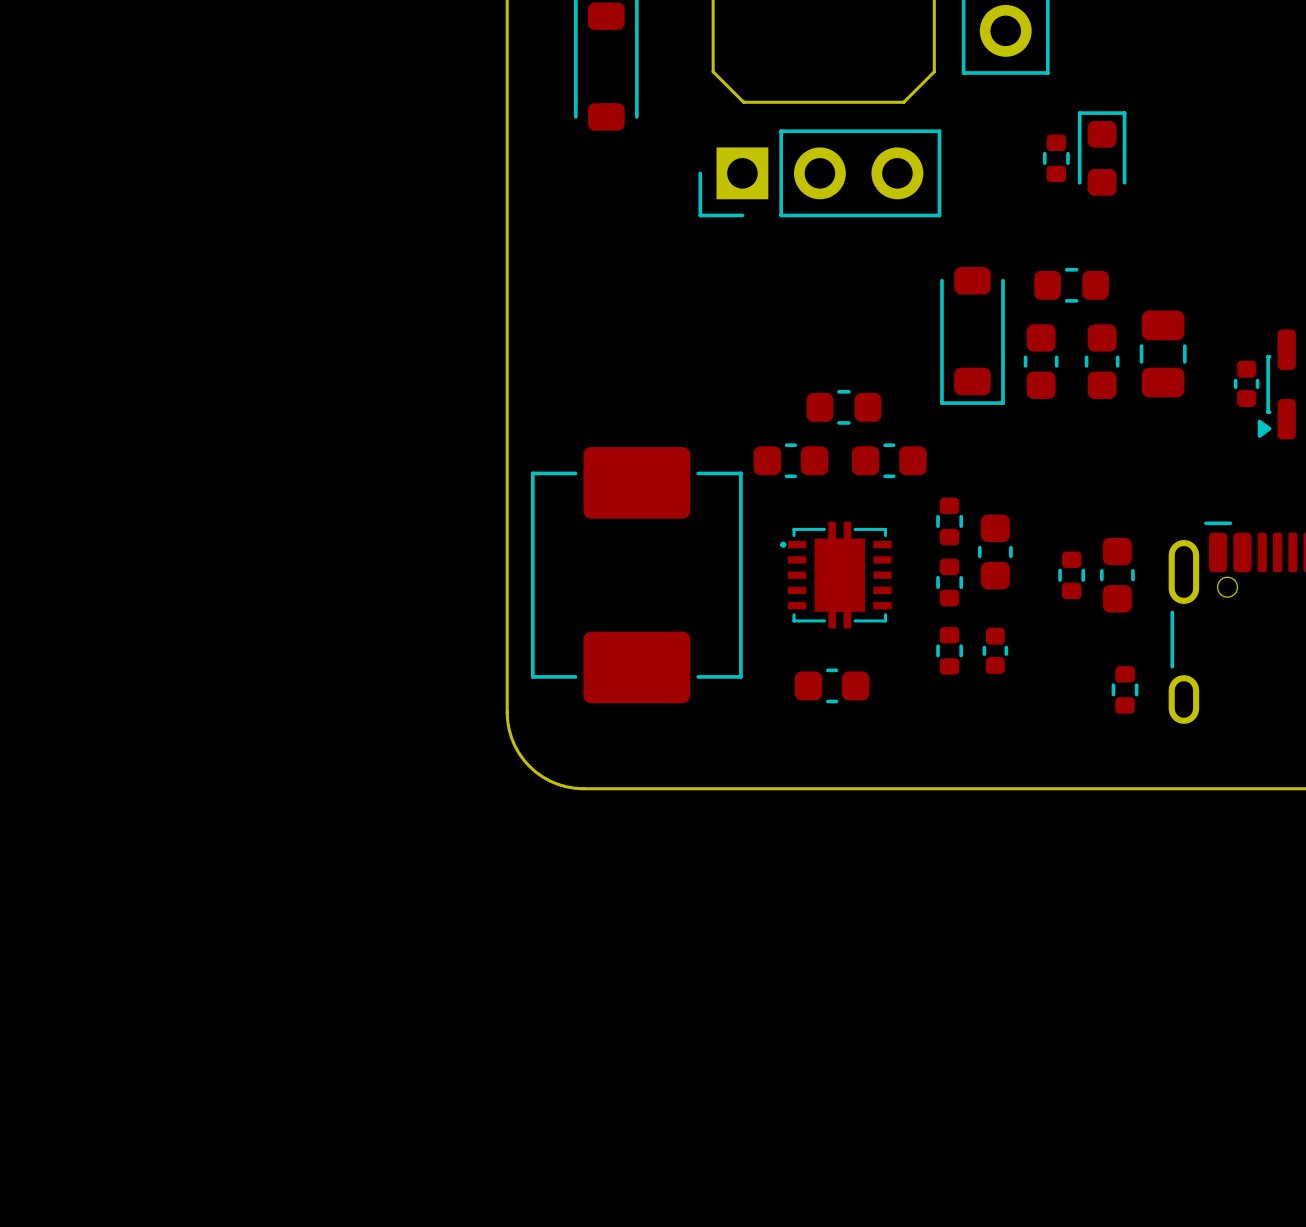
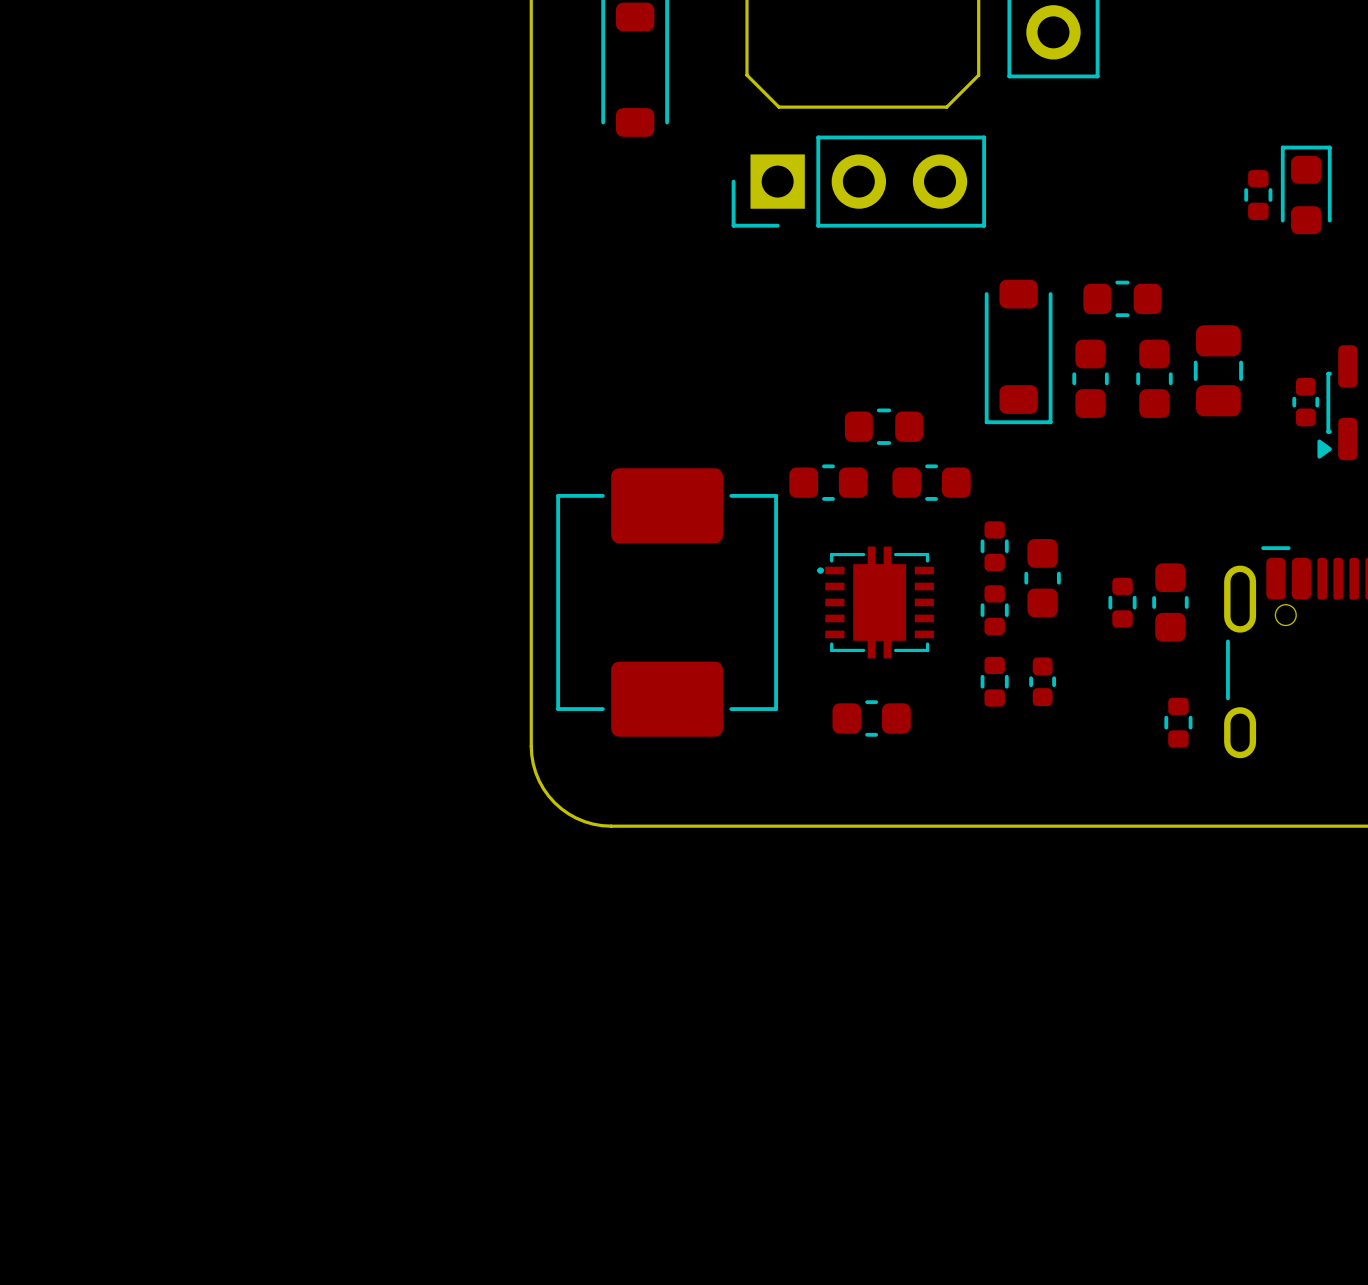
part position: (1102, 153) -> (1306, 189)
part position: (1056, 158) -> (1258, 195)

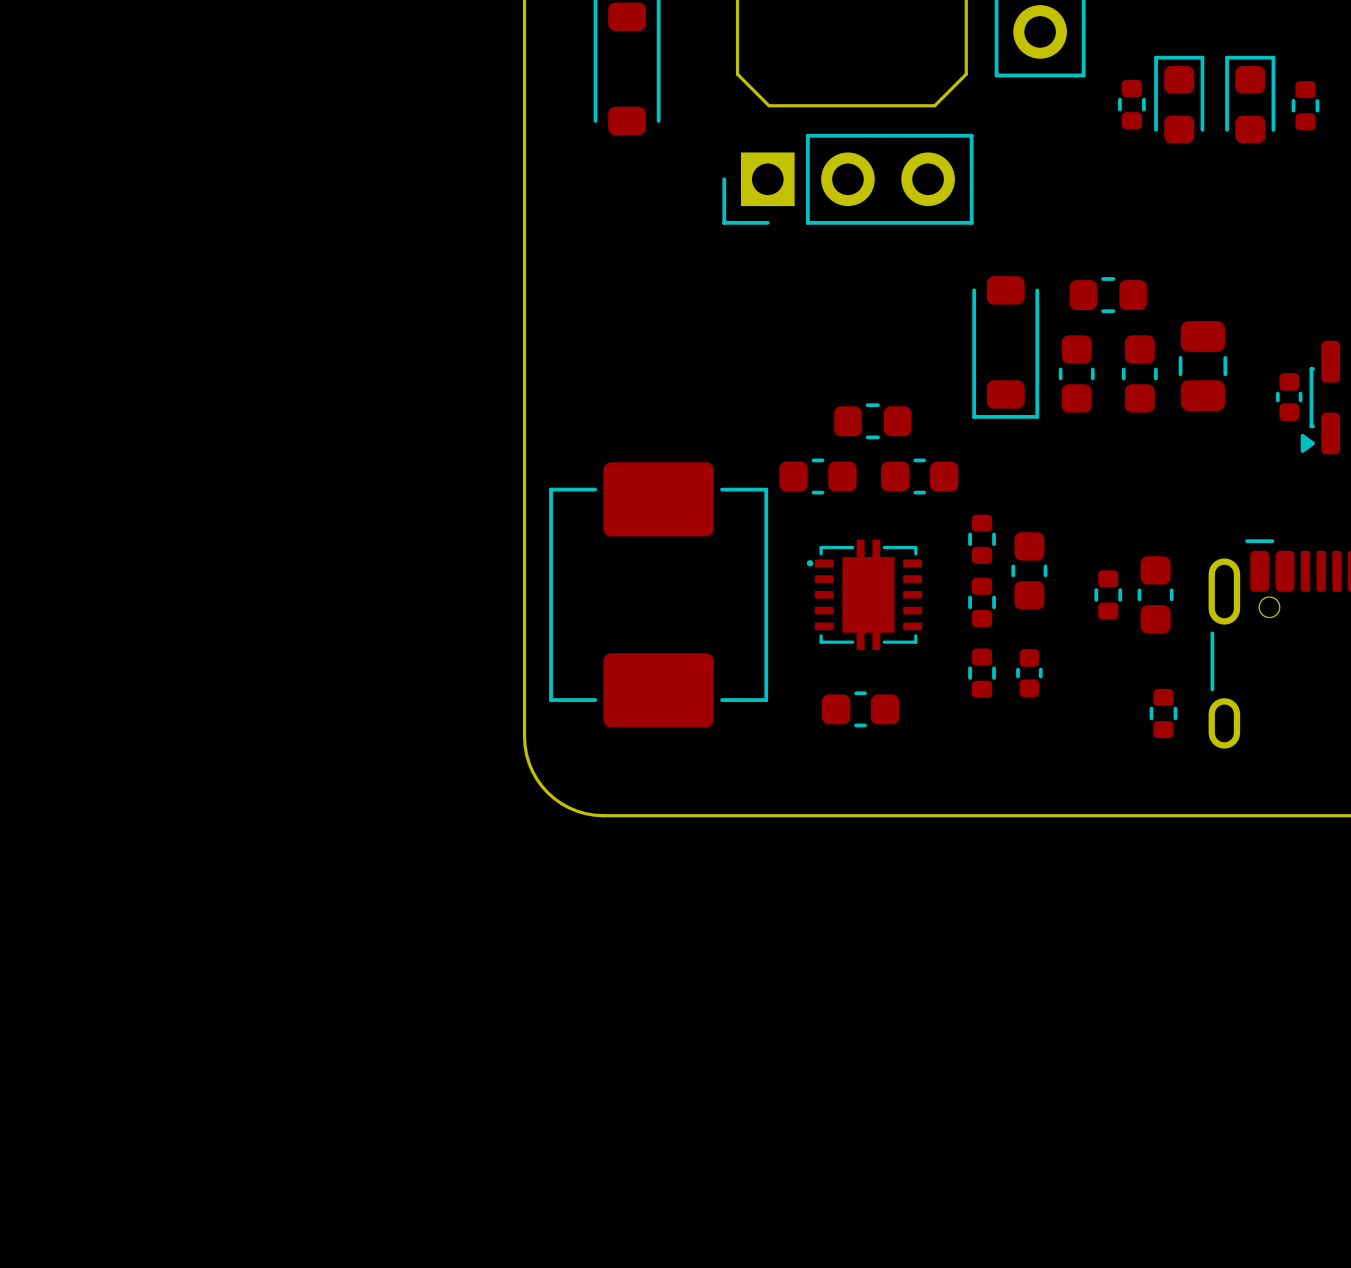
part: none -> (1179, 99)
part: none -> (1250, 99)
part: none -> (1131, 104)
part: none -> (1305, 105)
part: (1306, 189) -> none
part: (1258, 195) -> none

